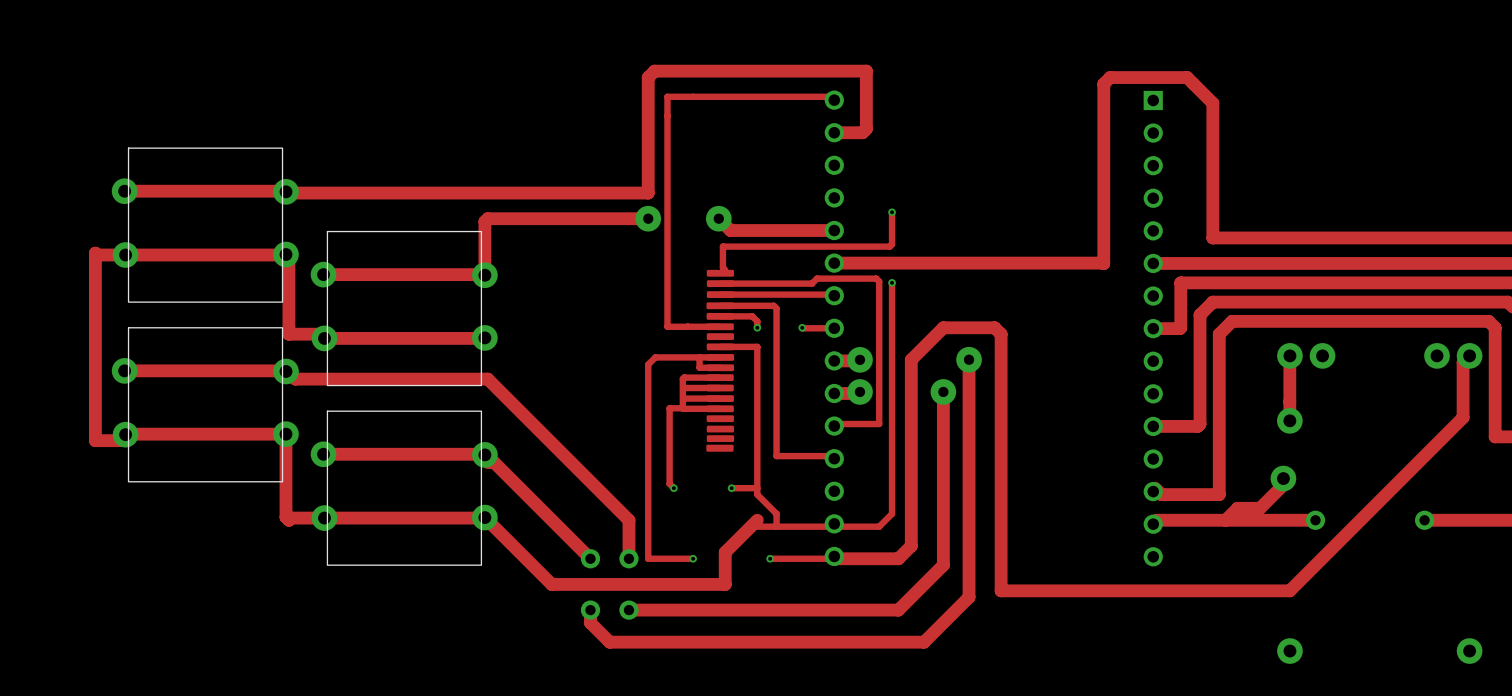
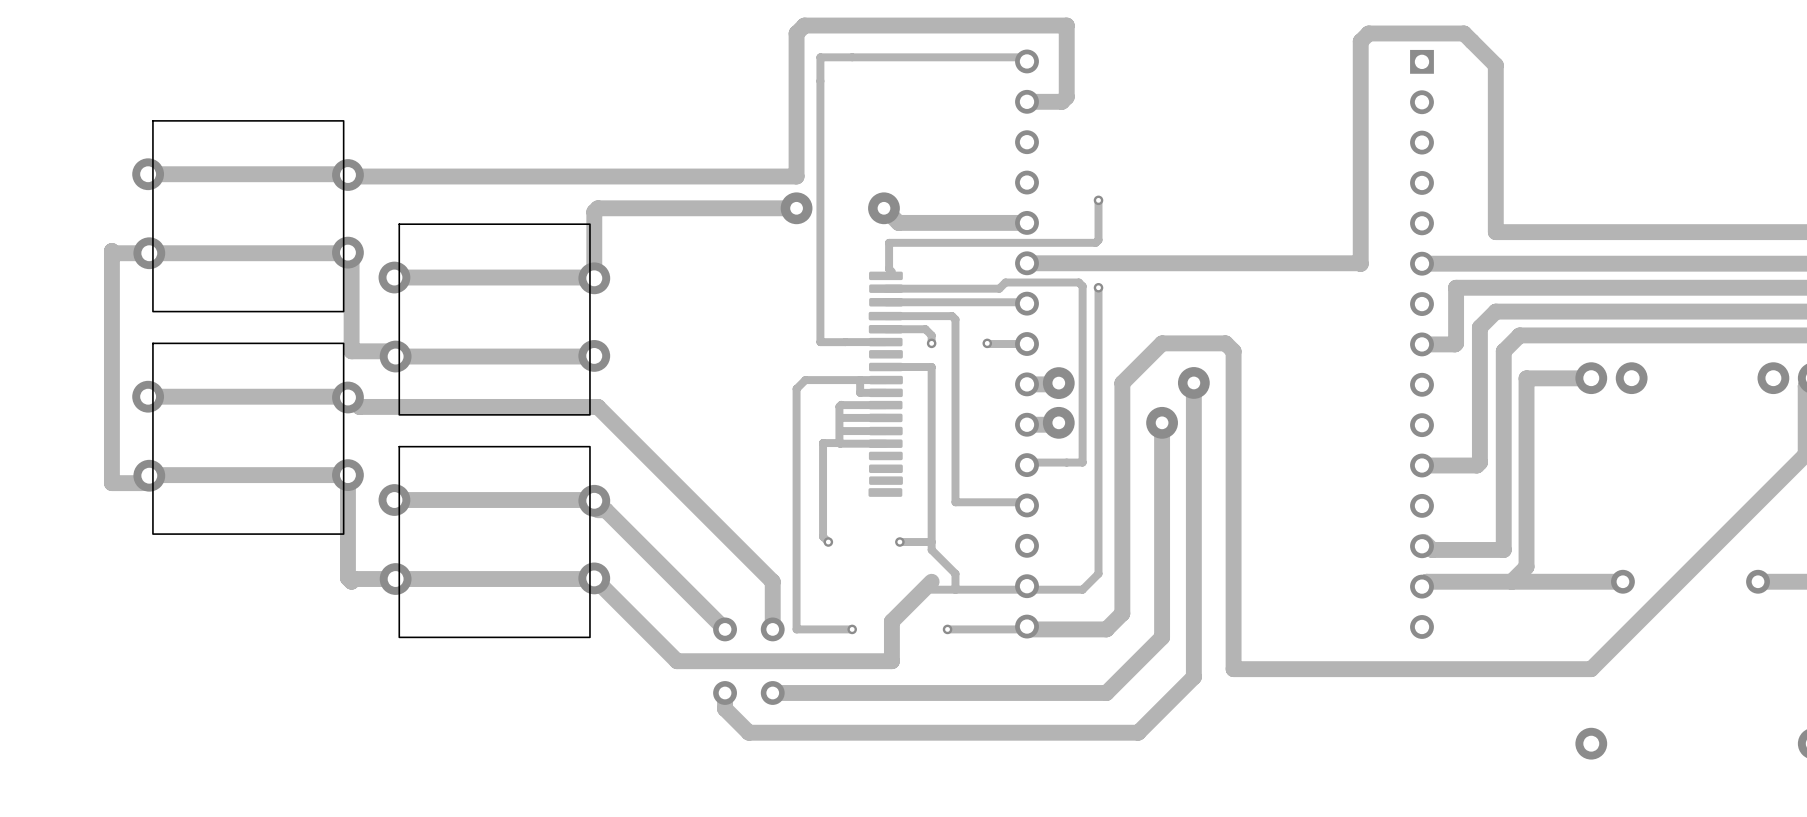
track: (1289, 356) (1289, 420) -> (1591, 378) (1526, 378) (1526, 566)
part: (1289, 420) -> none
part: (1283, 478) -> none
track: (1283, 484) (1260, 508) (1237, 508) -> none

